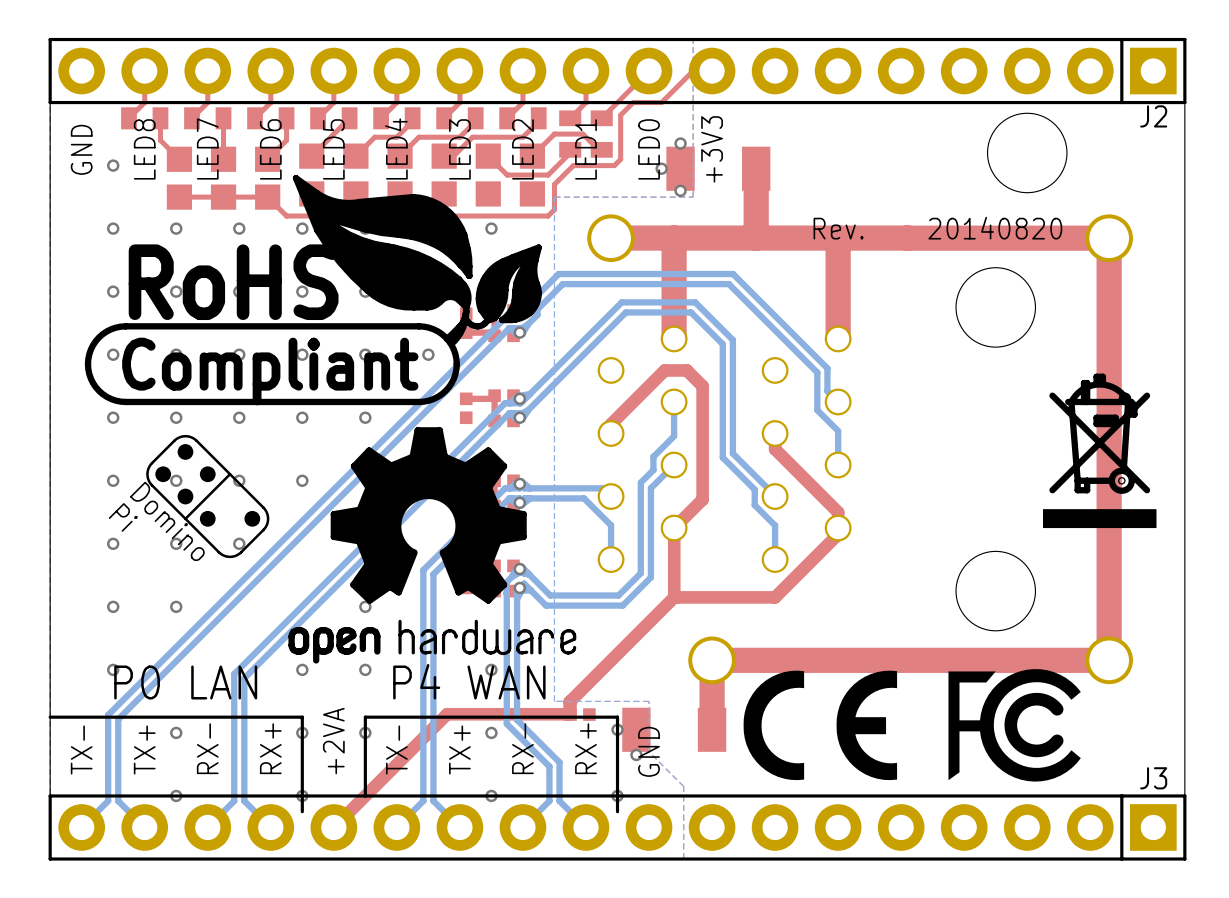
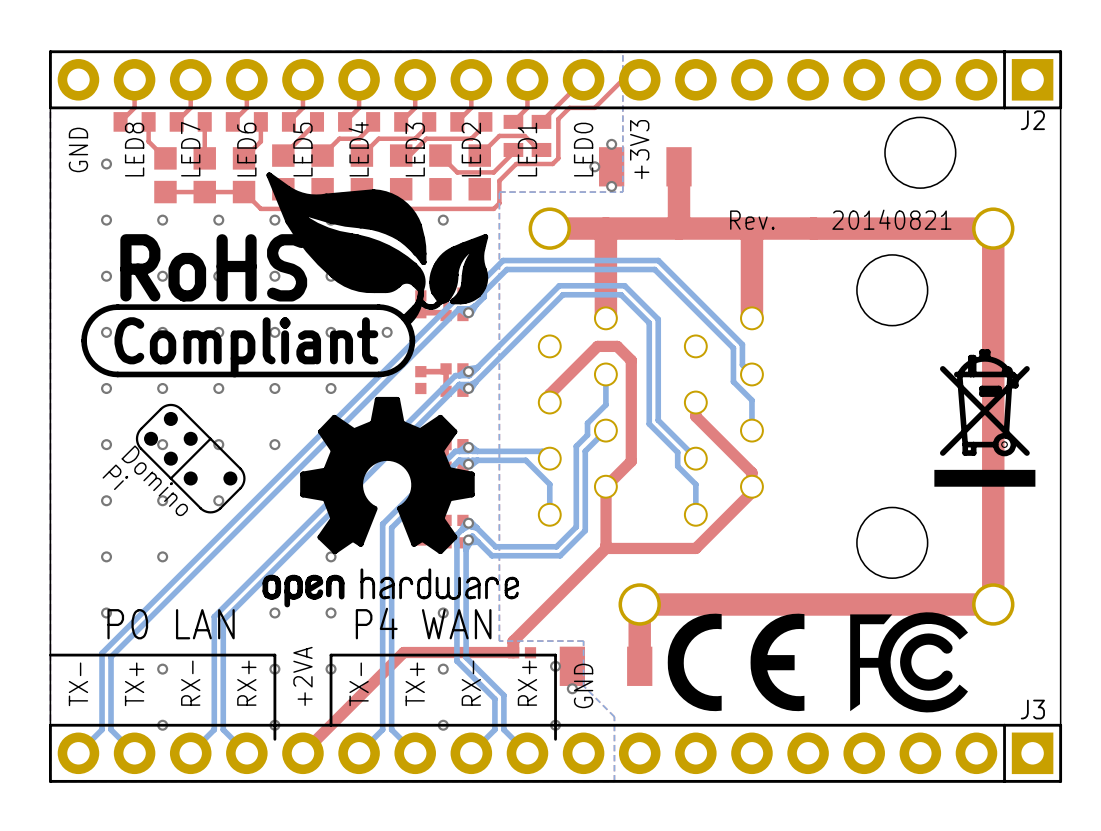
text: 20140820 (995, 228) -> 20140821 (891, 219)

